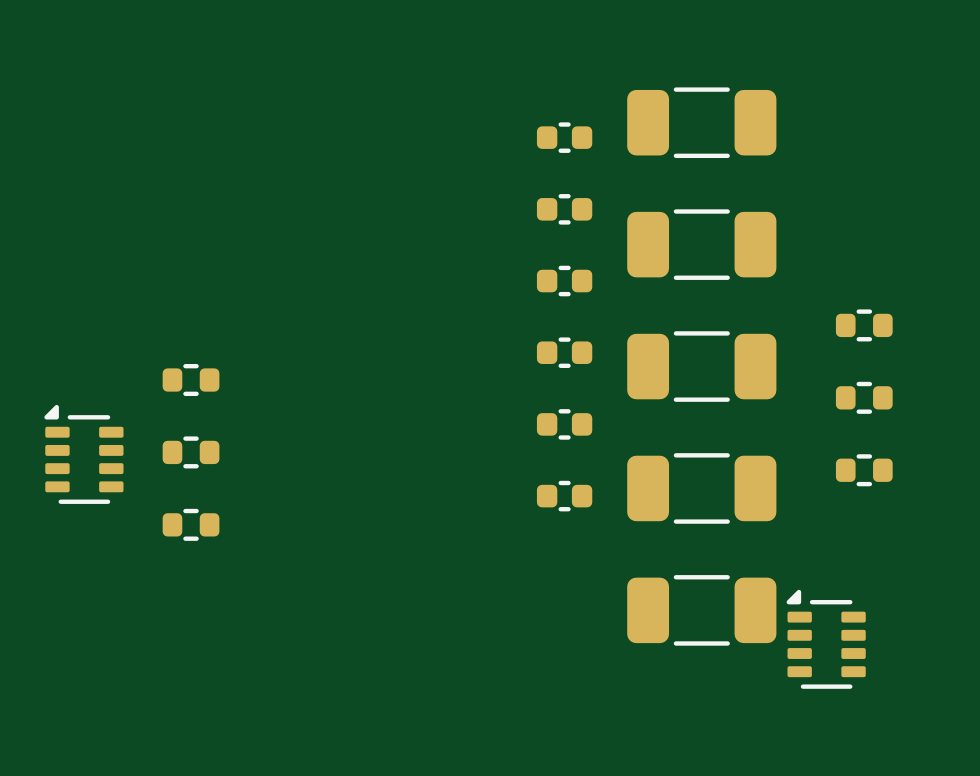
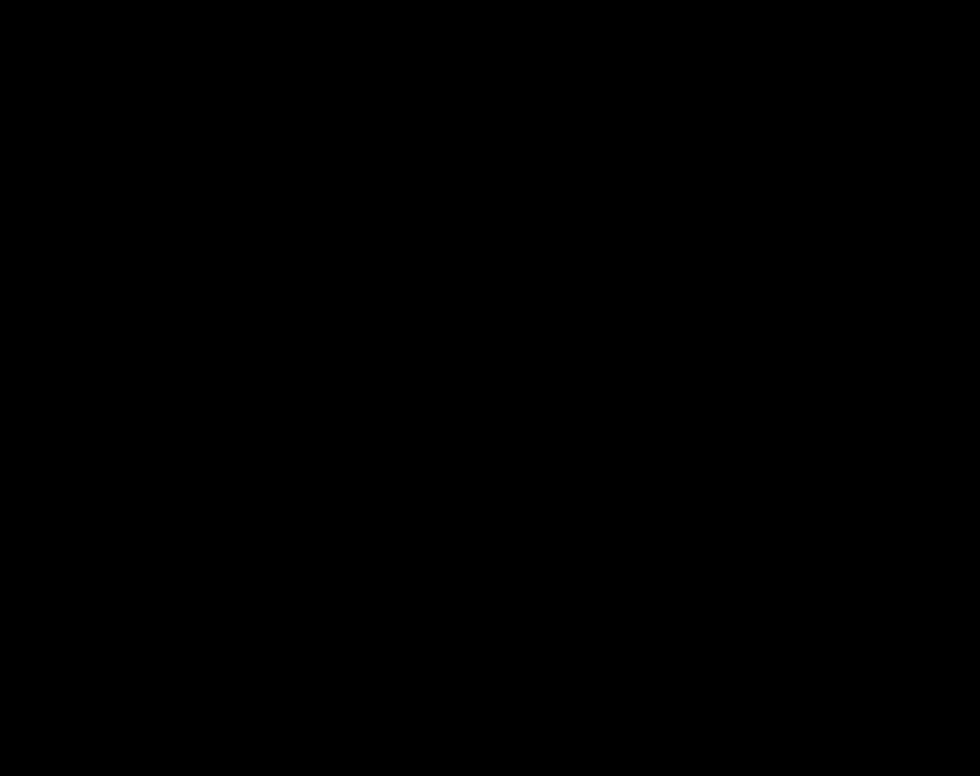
part: (701, 122) -> none
part: (564, 137) -> none
part: (564, 209) -> none
part: (701, 244) -> none
part: (564, 281) -> none
part: (864, 325) -> none
part: (564, 352) -> none
part: (701, 366) -> none
part: (191, 380) -> none
part: (864, 397) -> none
part: (564, 424) -> none
part: (191, 452) -> none
part: (83, 454) -> none
part: (864, 470) -> none
part: (701, 488) -> none
part: (564, 496) -> none
part: (191, 524) -> none
part: (701, 610) -> none
part: (826, 639) -> none

